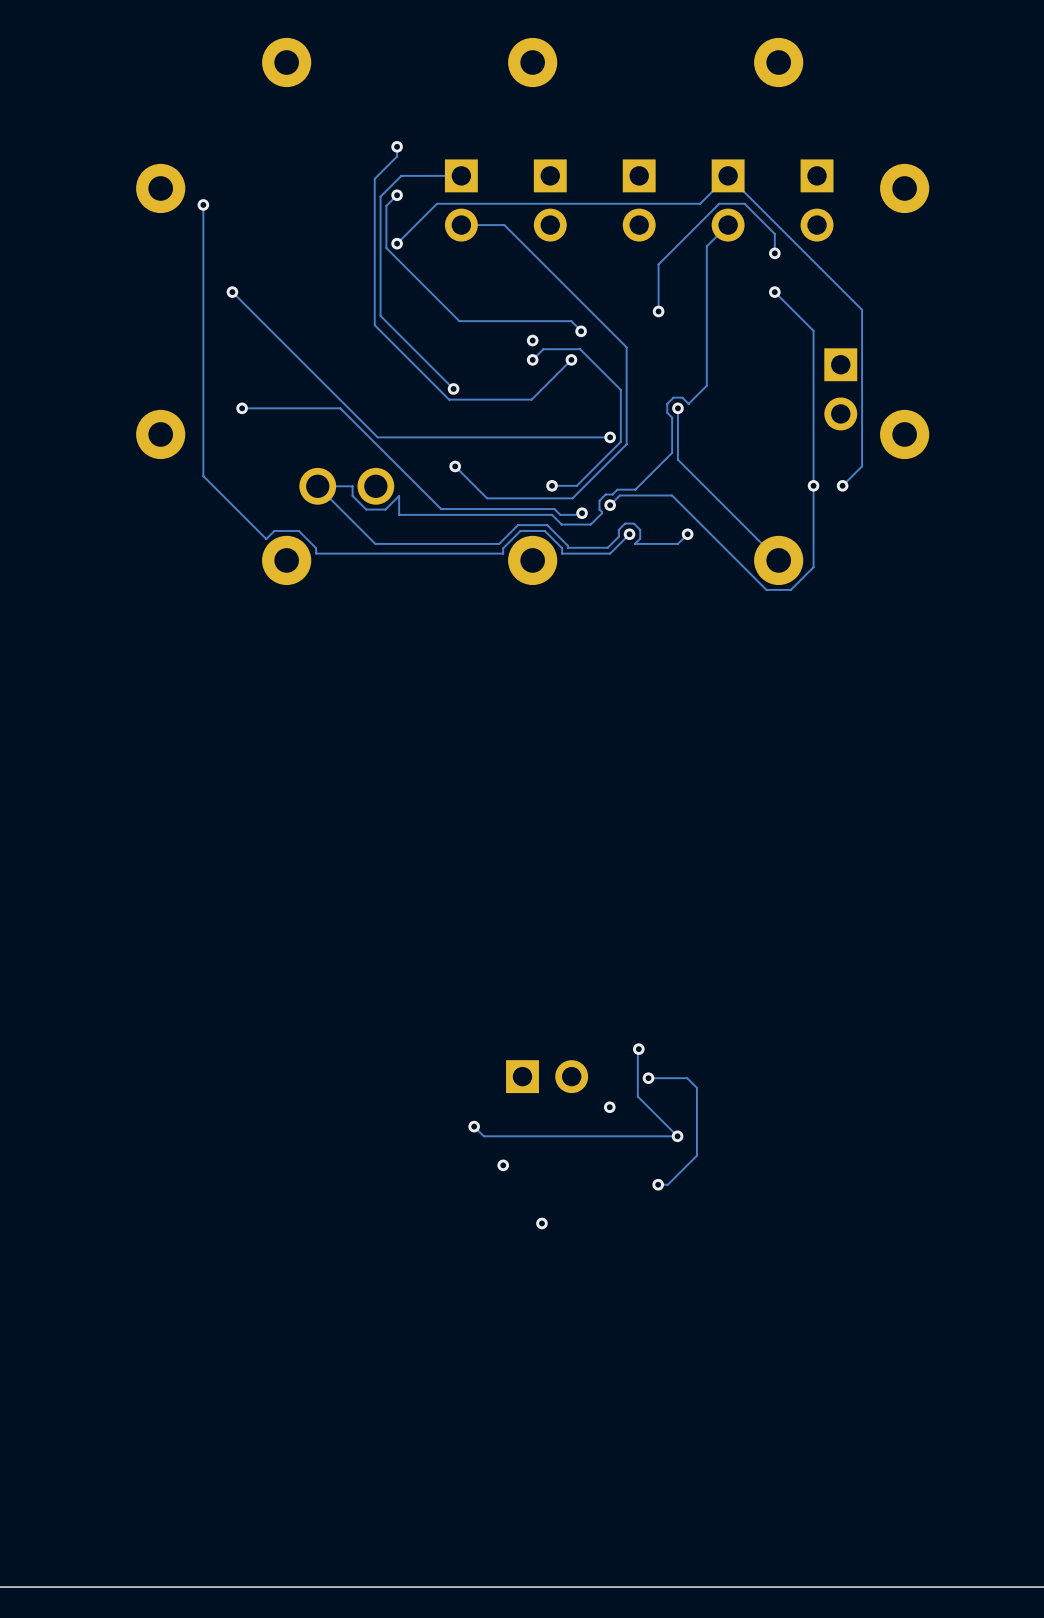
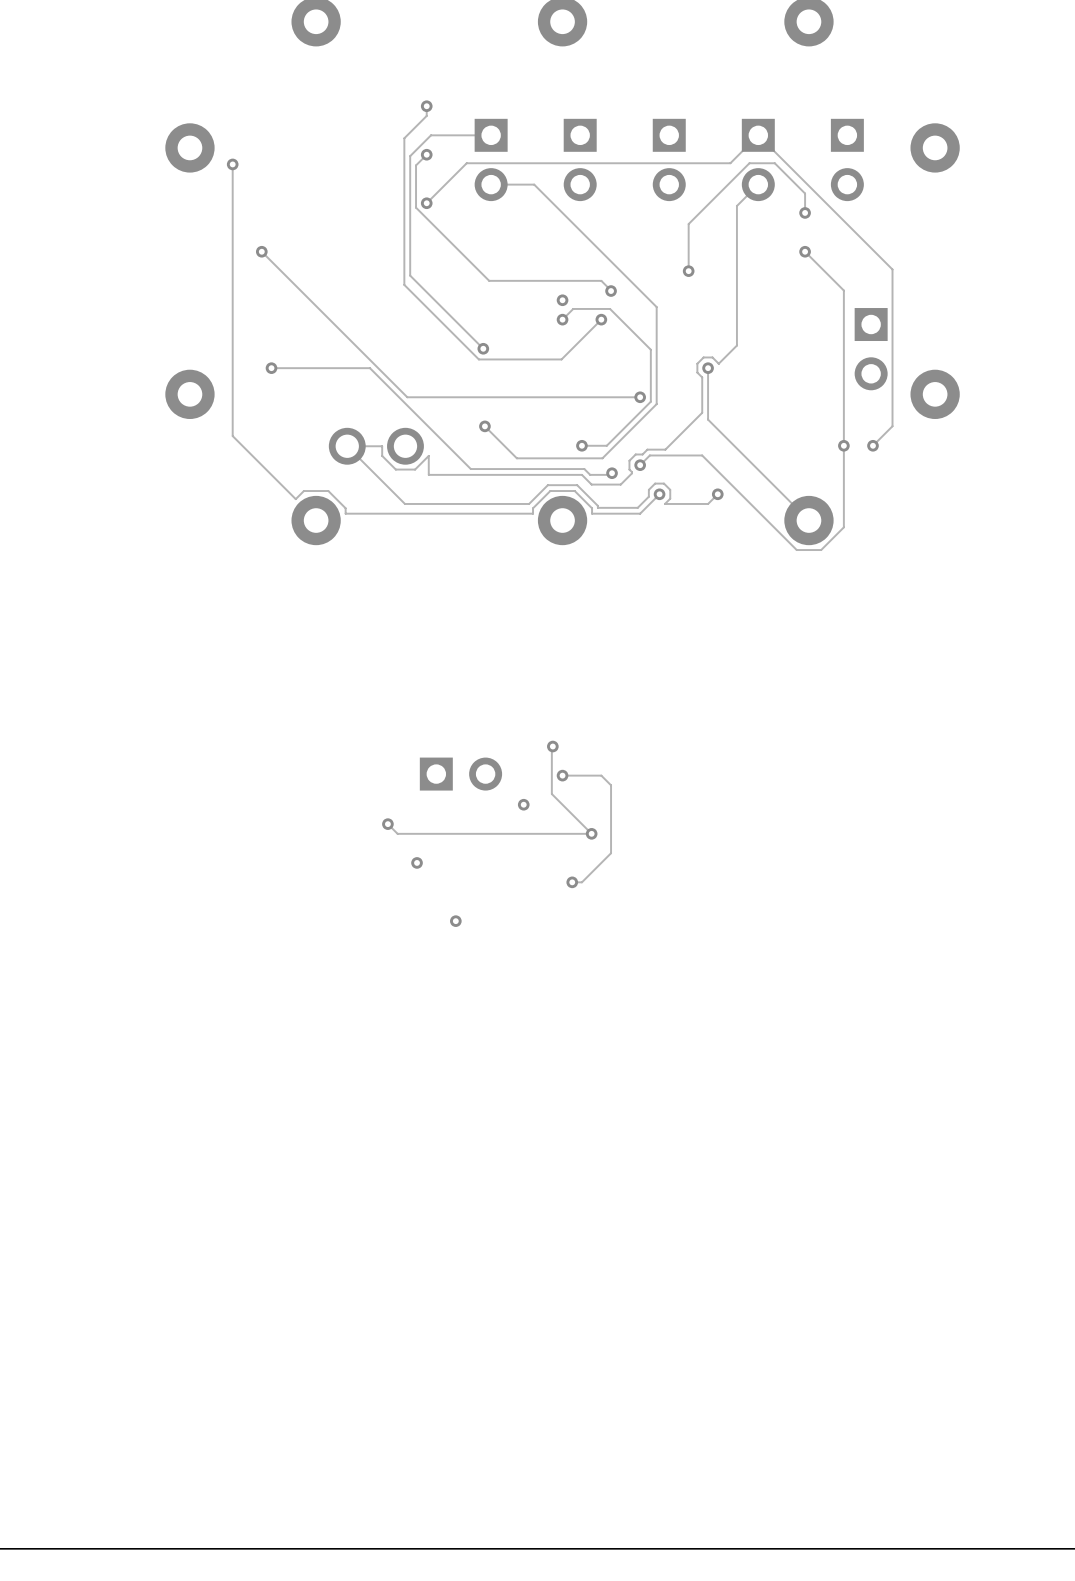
via: none -> (552, 746)
via: none -> (562, 775)
via: none -> (523, 804)
via: none -> (387, 824)
via: none -> (591, 833)
via: none -> (417, 862)
via: none -> (572, 882)
via: none -> (455, 921)
track: (638, 1049) (637, 1096) (677, 1136) (483, 1136) (474, 1126) -> (552, 746) (551, 794) (591, 833) (397, 833) (387, 824)
via: (638, 1049) -> none
part position: (547, 1076) -> (460, 774)
track: (648, 1078) (687, 1078) (696, 1087) (696, 1155) (667, 1184) (658, 1184) -> (562, 775) (601, 775) (611, 785) (611, 853) (581, 882) (572, 882)
via: (648, 1078) -> none
via: (609, 1107) -> none
via: (474, 1126) -> none
via: (677, 1136) -> none
via: (503, 1165) -> none
via: (658, 1184) -> none
via: (541, 1223) -> none

